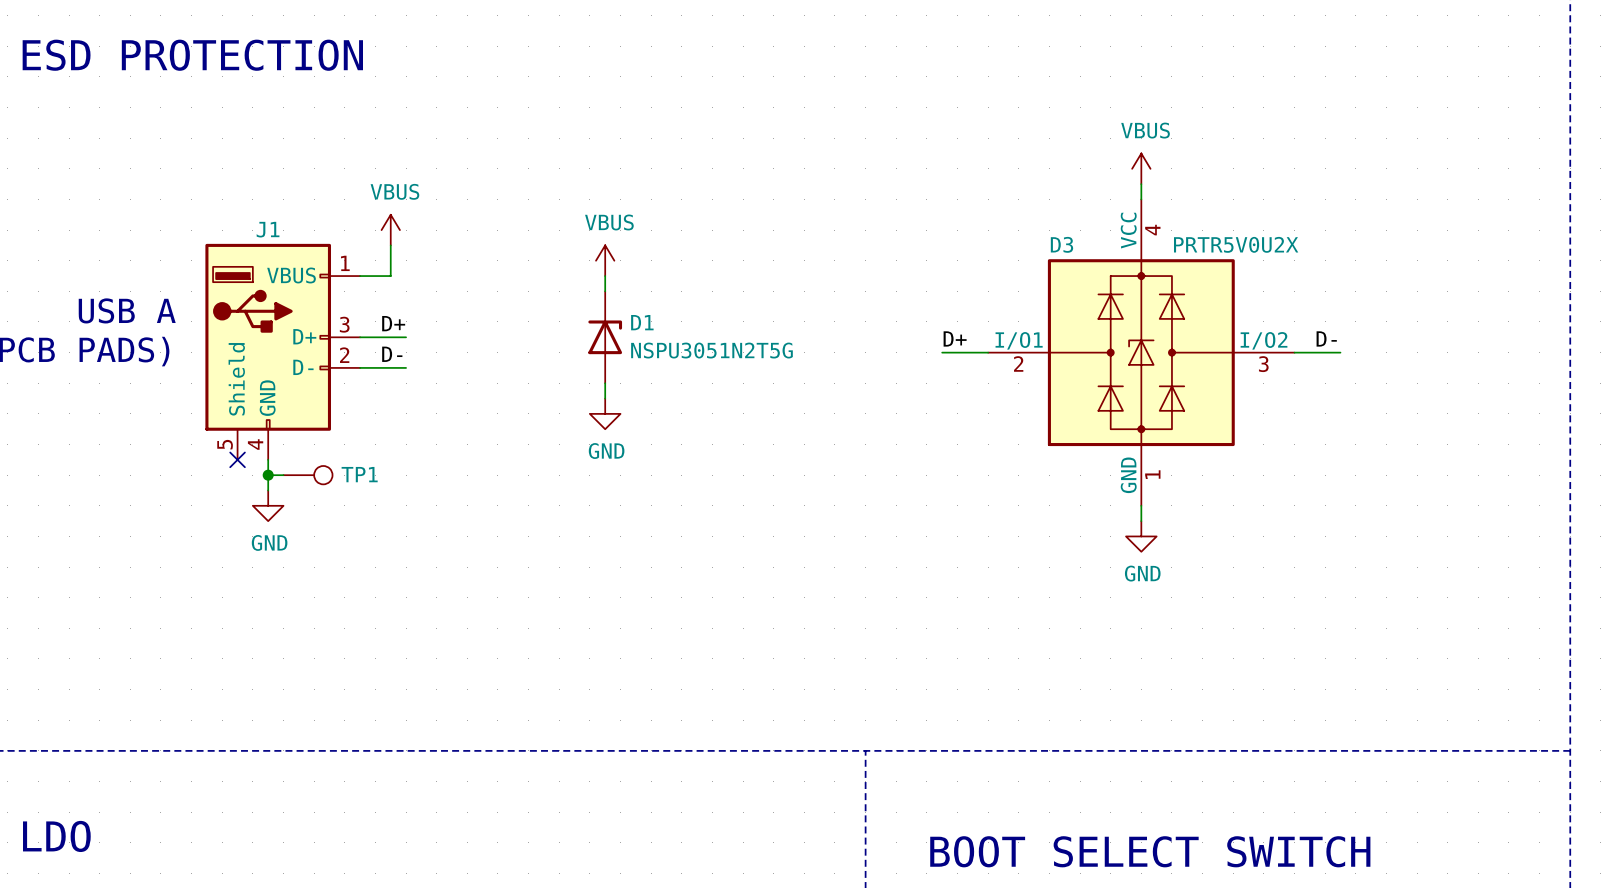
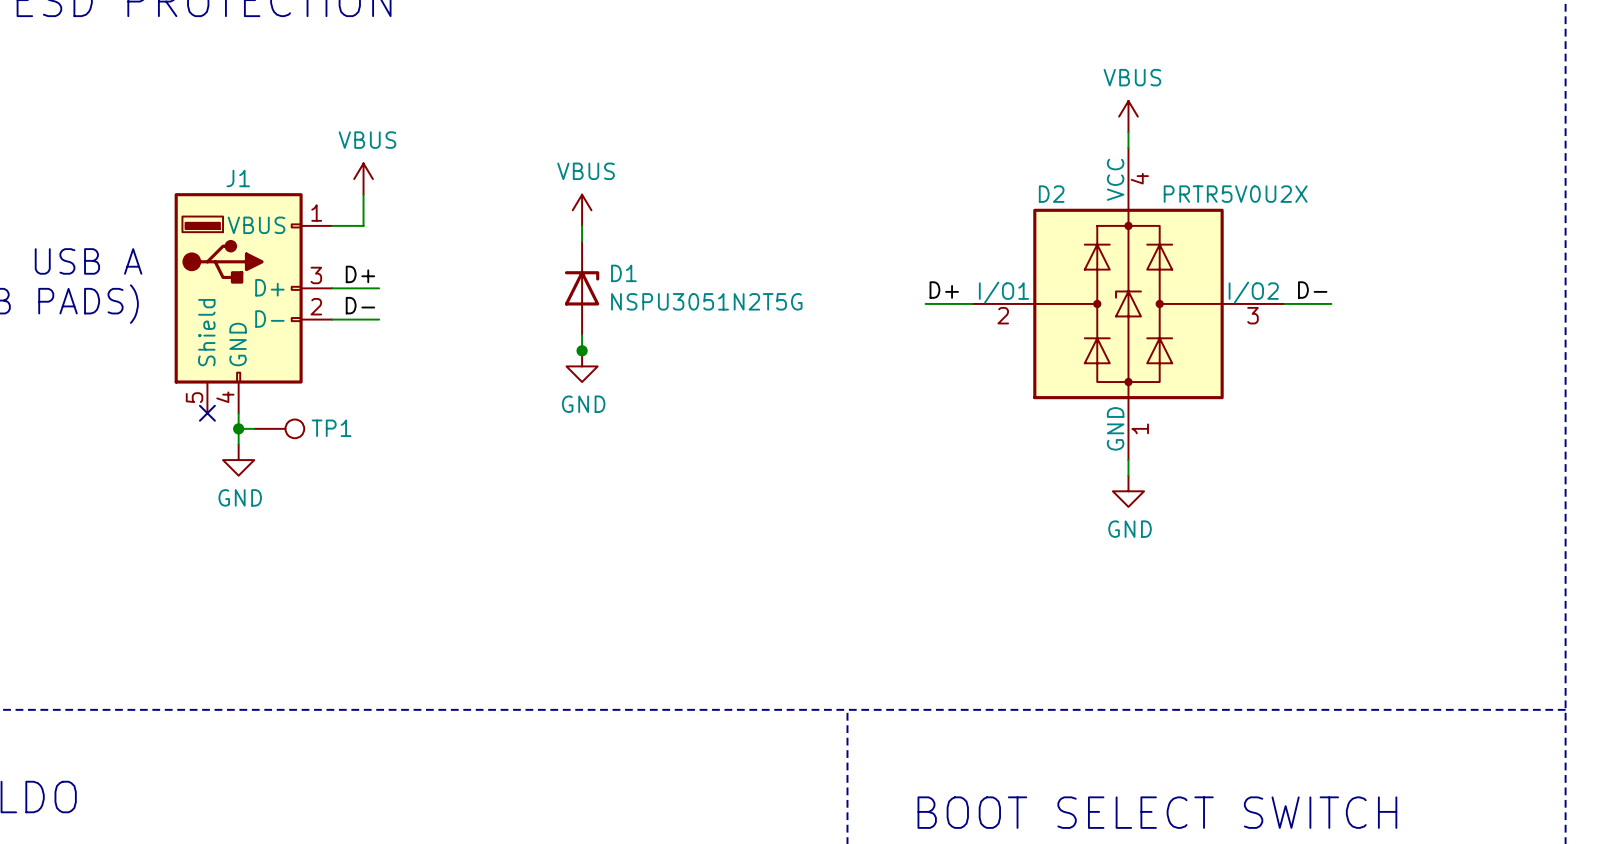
D3 name: D3 (1061, 244) -> D2 (1051, 194)
junction: none -> (582, 350)

